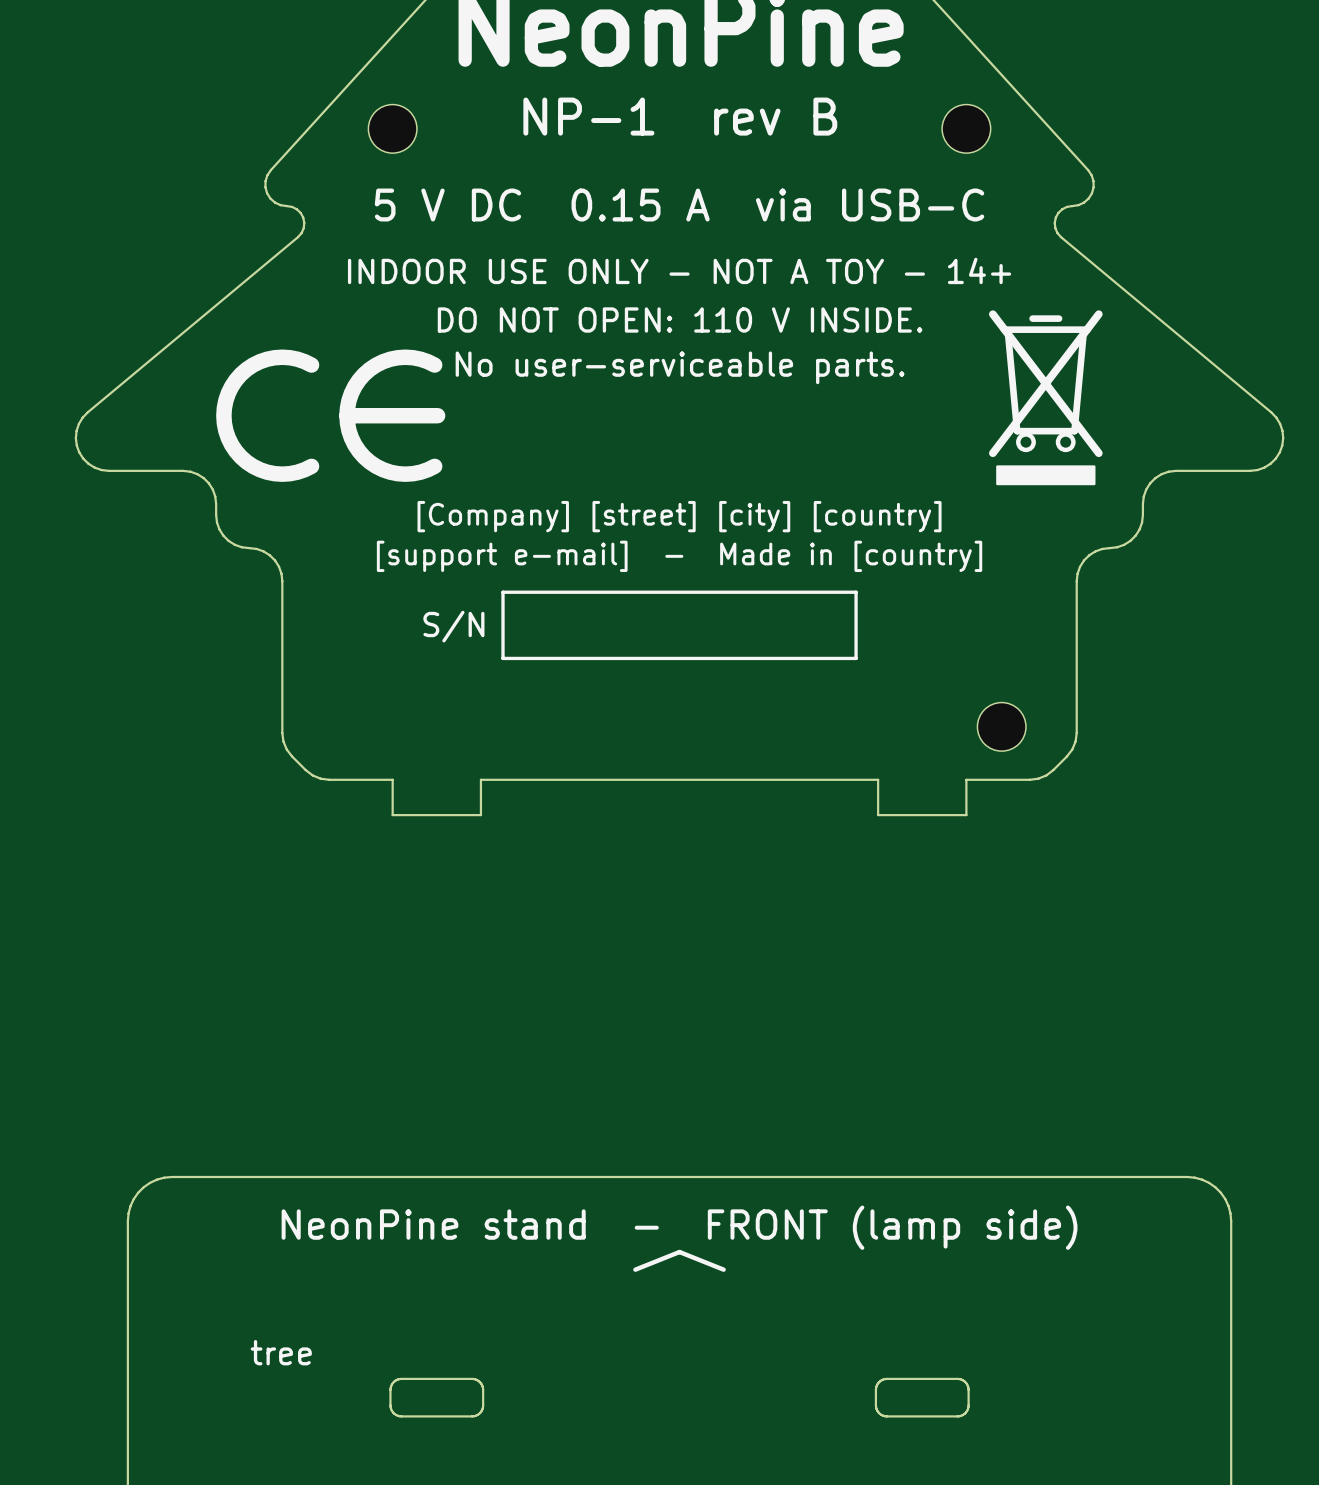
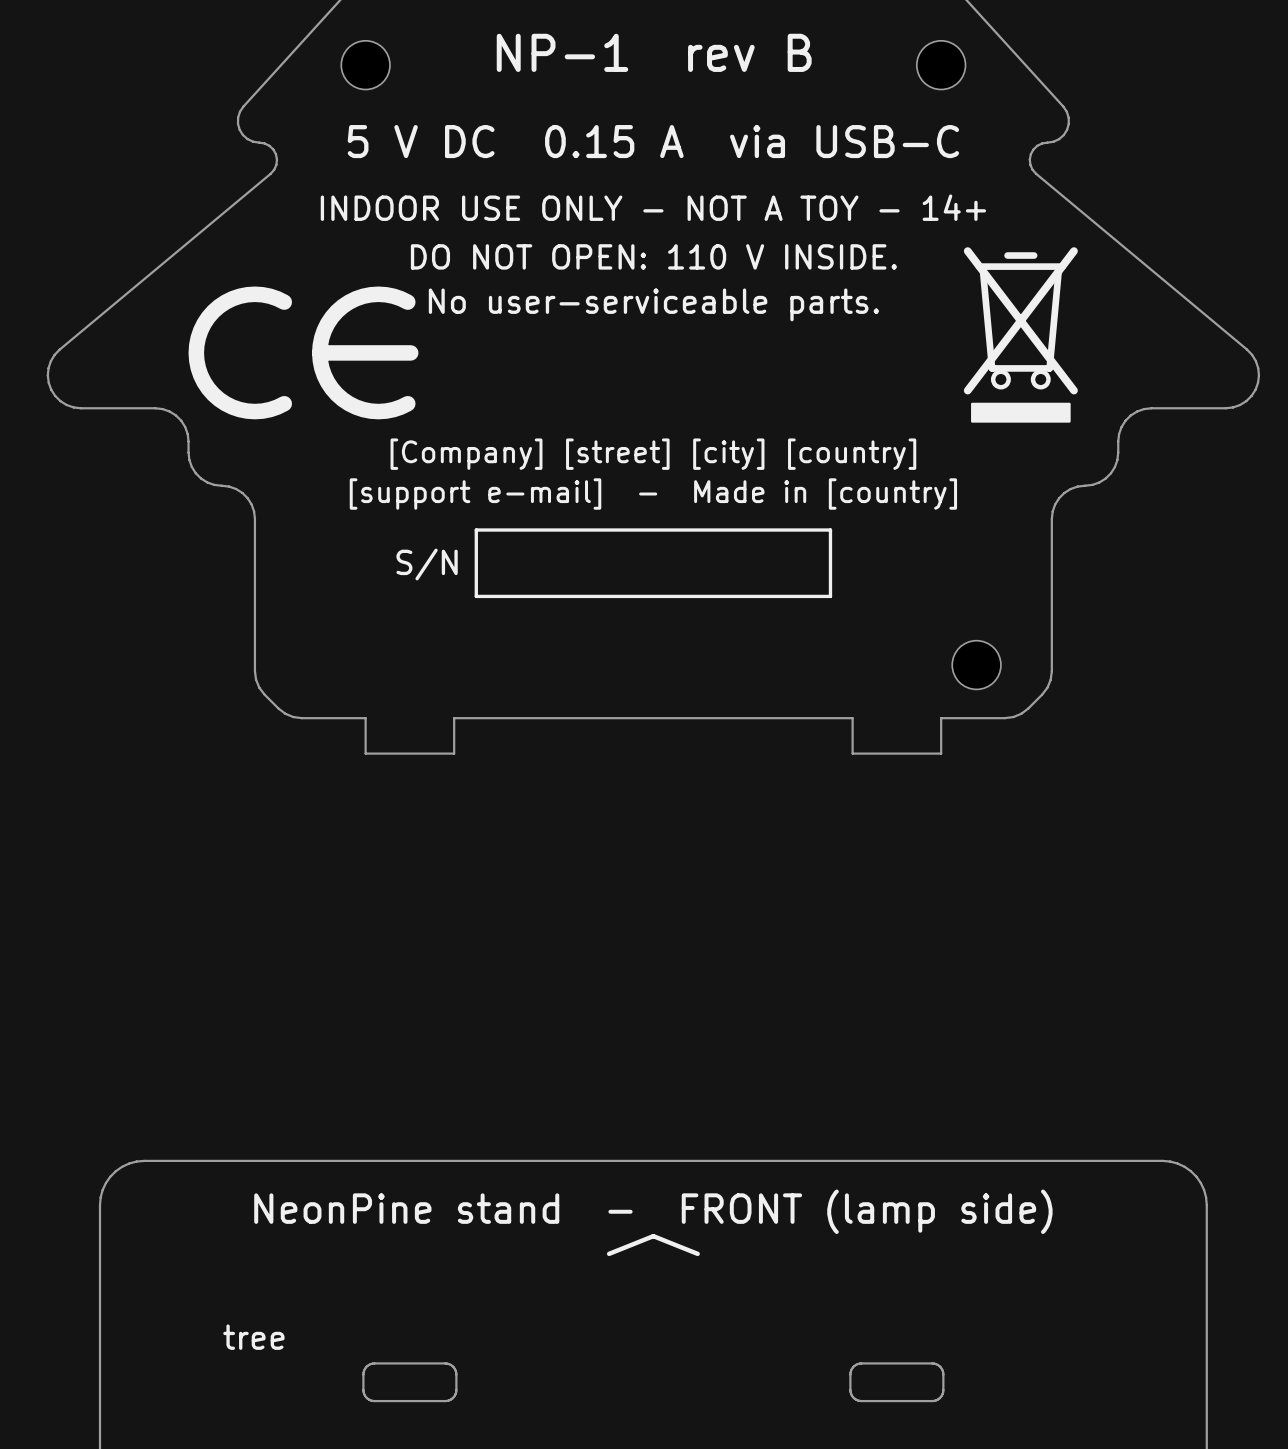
text position: NeonPine stand - FRONT (lamp side) (679, 1227) -> NeonPine stand - FRONT (lamp side) (653, 1211)
board edge: (127, 1265) (128, 1213) (133, 1199) (149, 1182) (172, 1176) (1187, 1176) (1209, 1182) (1225, 1199) (1230, 1213) (1231, 1265) -> (99, 1205) (102, 1190) (115, 1171) (129, 1163) (144, 1160) (1162, 1160) (1177, 1163) (1190, 1171) (1204, 1190) (1206, 1205)
line: (635, 1269) (679, 1252) (723, 1269) -> (609, 1253) (653, 1236) (697, 1253)
text position: tree (281, 1352) -> tree (253, 1337)
board edge: (401, 1378) (394, 1381) (390, 1388) (390, 1407) (397, 1415) (472, 1416) (477, 1414) (482, 1409) (482, 1388) (475, 1379) (401, 1378) -> (374, 1363) (367, 1366) (363, 1372) (363, 1391) (370, 1400) (445, 1401) (450, 1399) (455, 1393) (456, 1372) (449, 1364) (374, 1363)
board edge: (886, 1378) (961, 1379) (968, 1388) (967, 1409) (963, 1414) (957, 1416) (883, 1415) (876, 1407) (876, 1388) (879, 1381) (886, 1378) -> (861, 1363) (936, 1364) (943, 1372) (942, 1393) (937, 1399) (932, 1401) (857, 1400) (850, 1391) (850, 1372) (854, 1366) (861, 1363)

